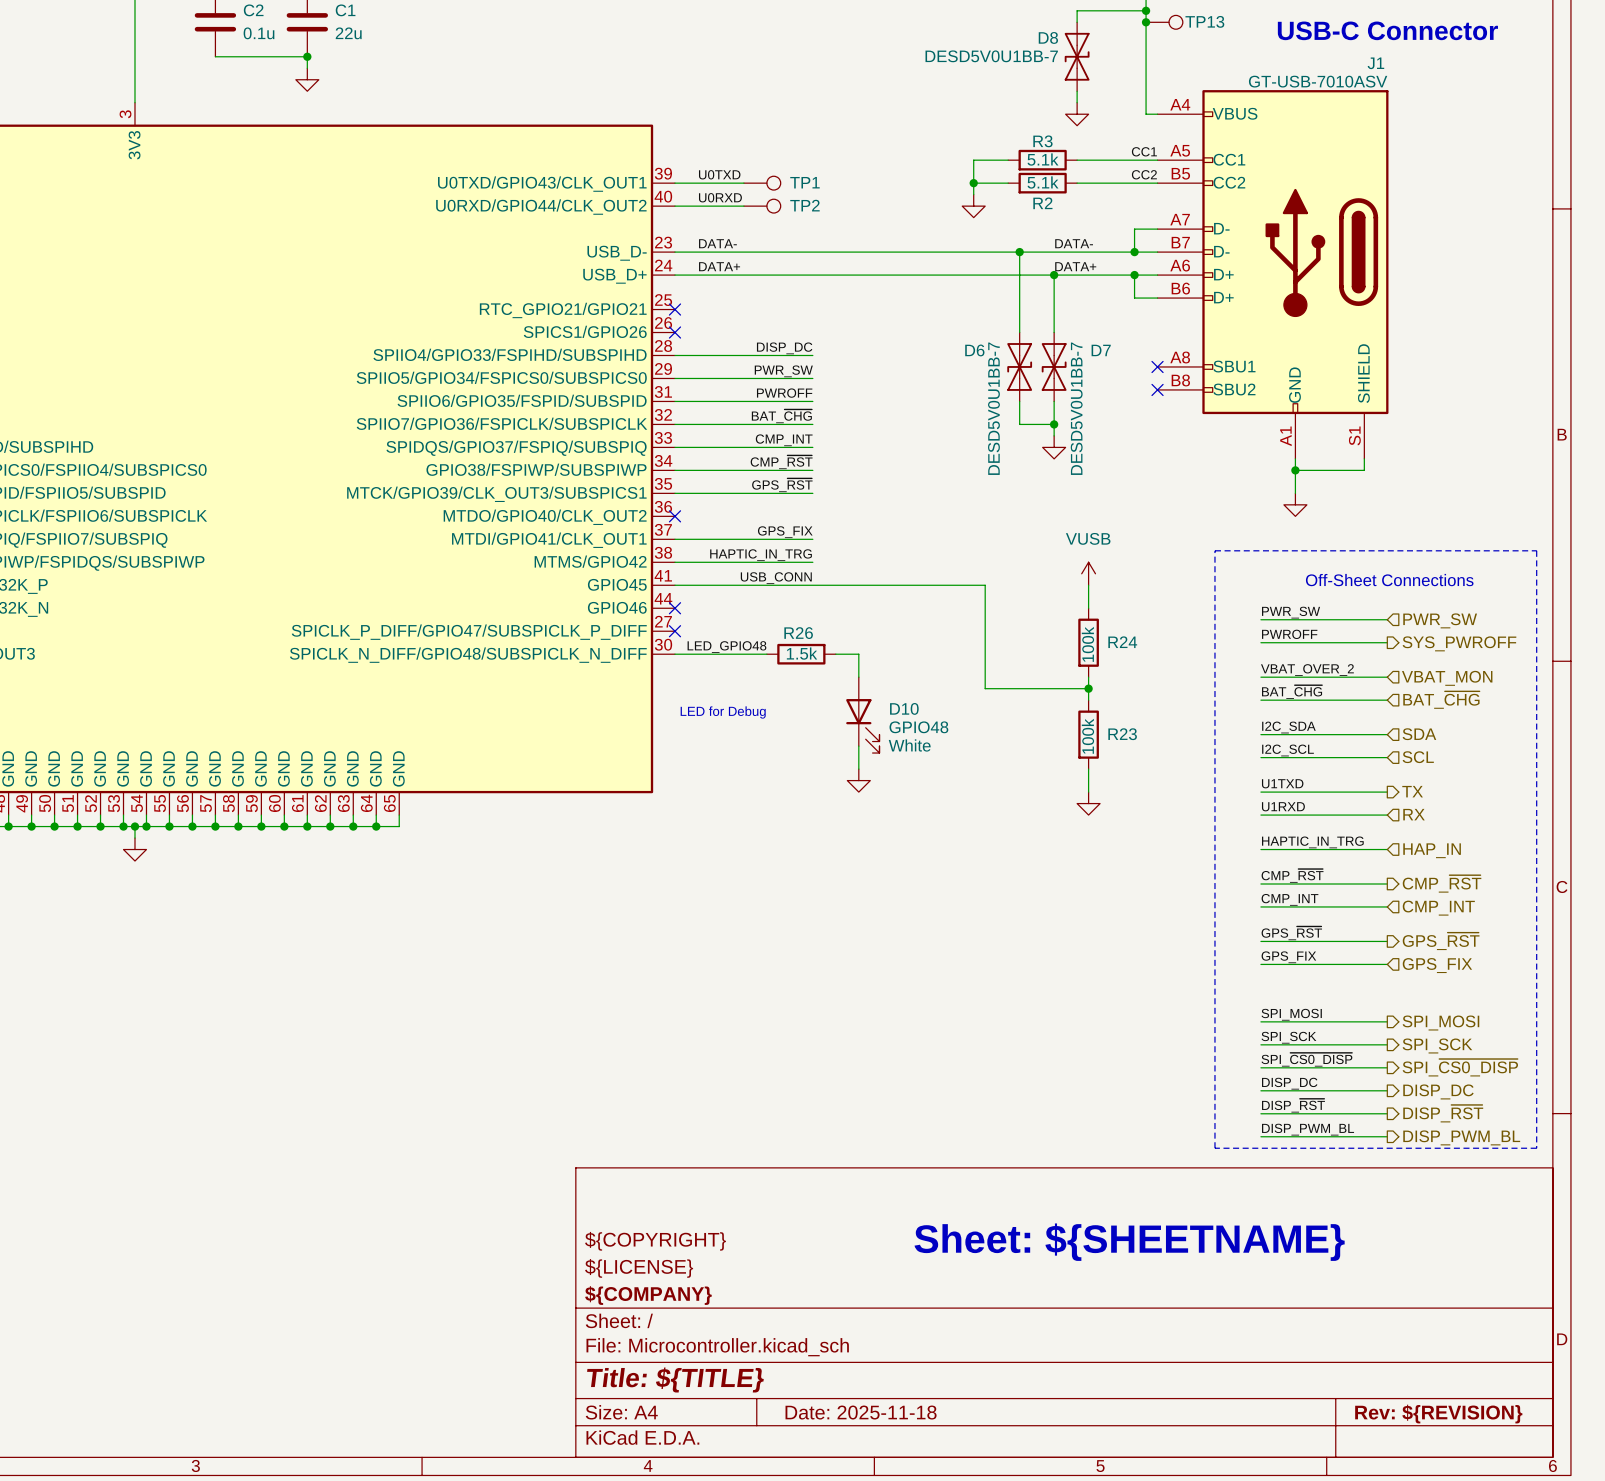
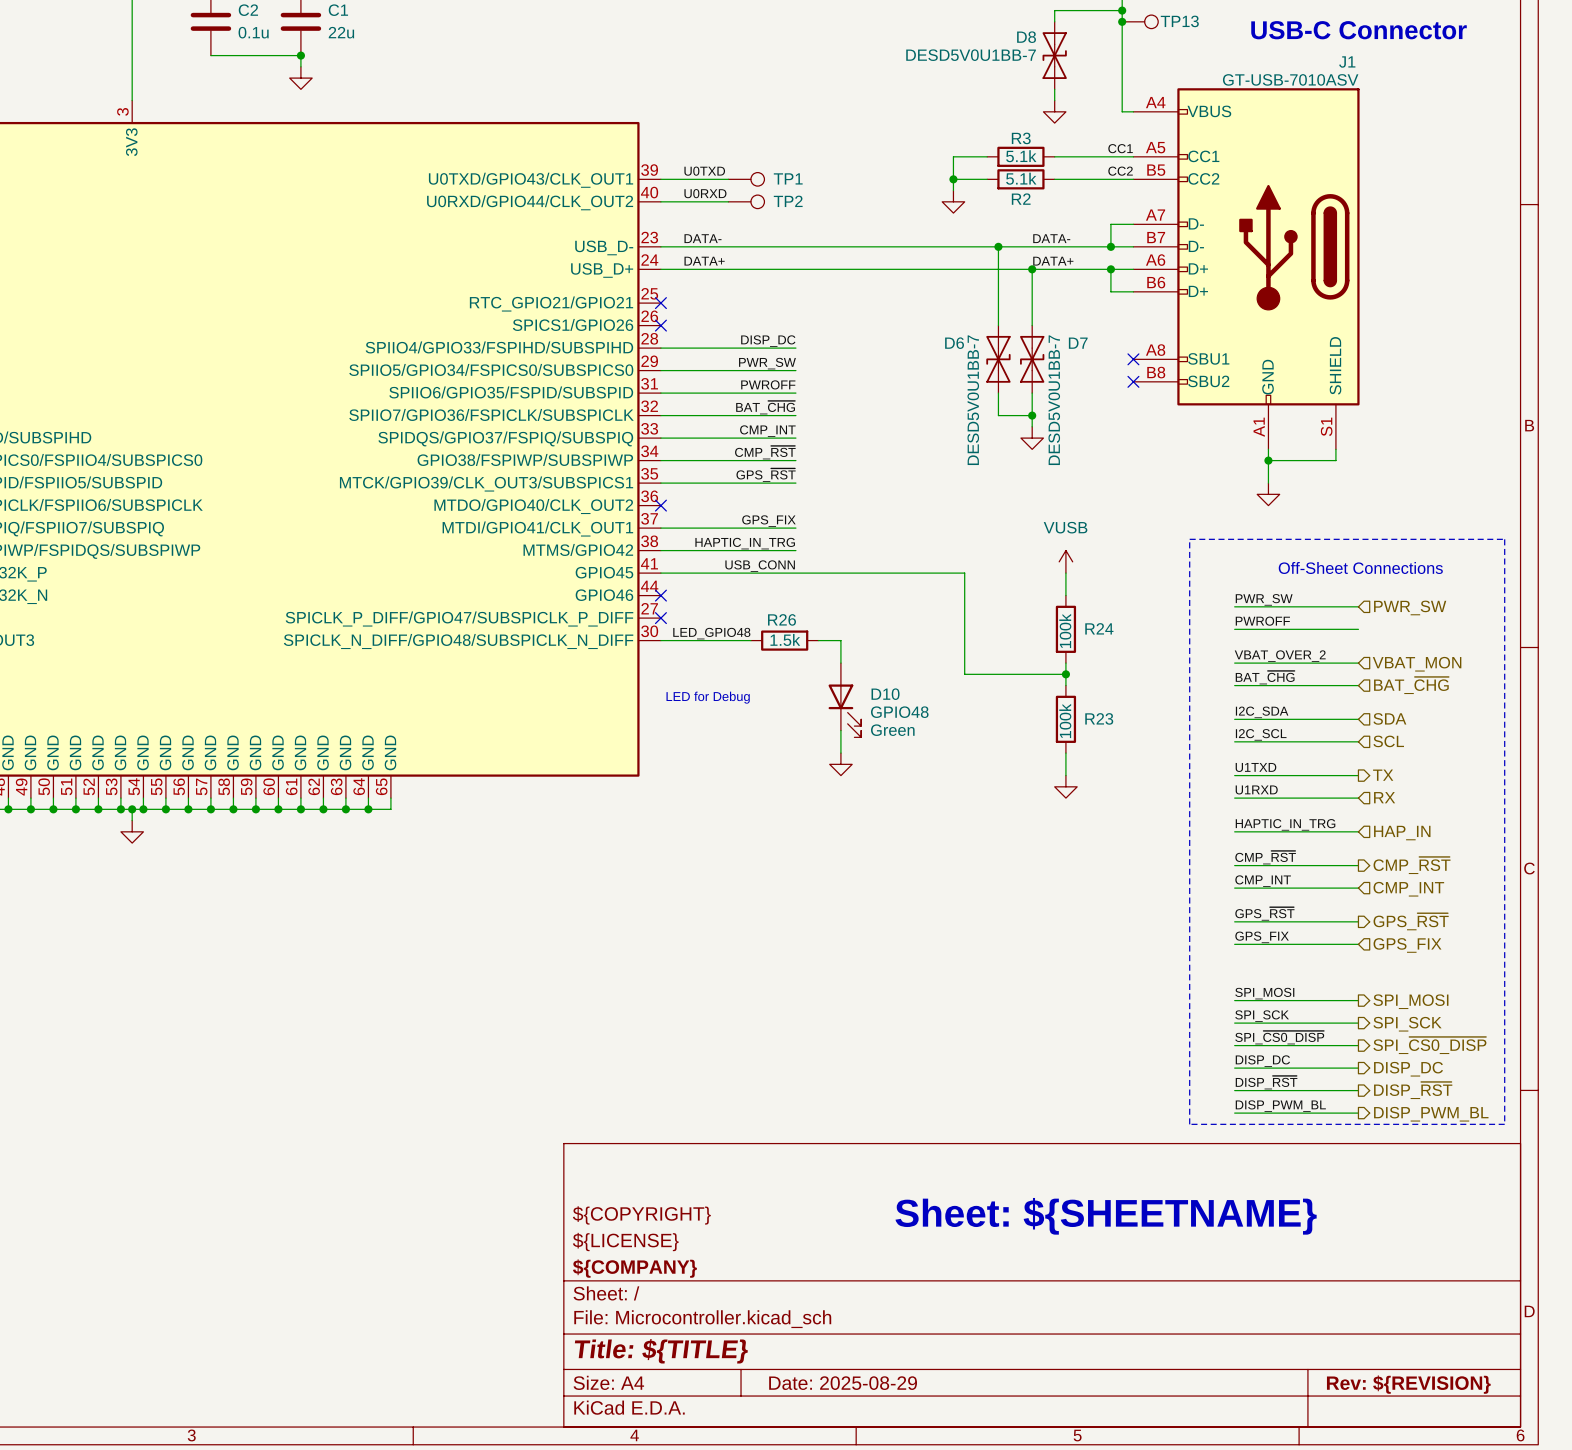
hierarchical label: SYS_PWROFF (1459, 643) -> none
D10 text: White (909, 745) -> Green (892, 730)
title block: Date: 2025-11-18 (861, 1412) -> Date: 2025-08-29 (843, 1383)

